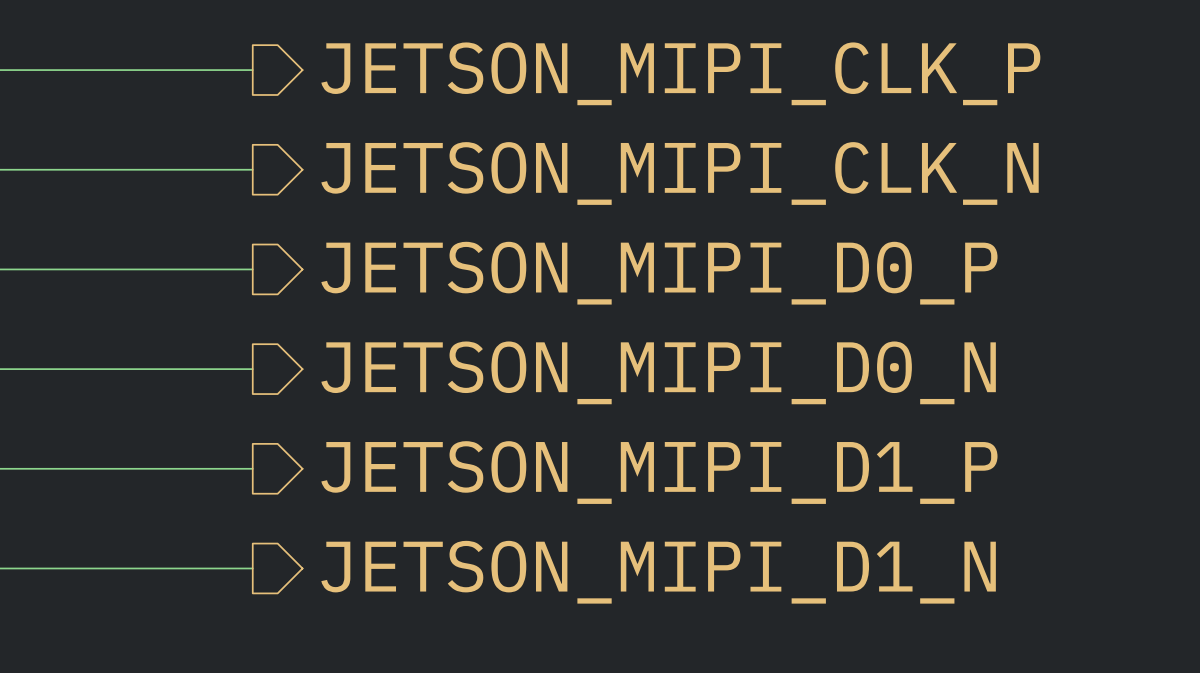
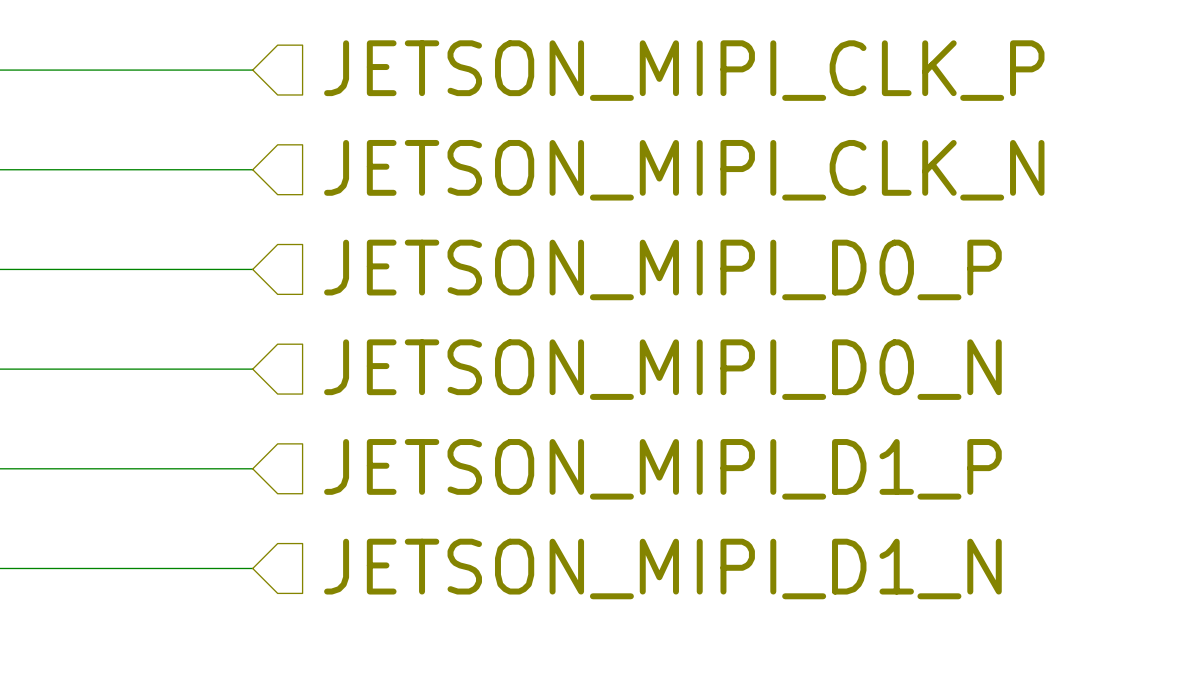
hierarchical label shape: output (680, 73) -> input (684, 70)
hierarchical label shape: output (680, 173) -> input (684, 170)
hierarchical label shape: output (659, 273) -> input (662, 269)
hierarchical label shape: output (658, 372) -> input (662, 369)
hierarchical label shape: output (659, 472) -> input (662, 469)
hierarchical label shape: output (658, 572) -> input (662, 568)

